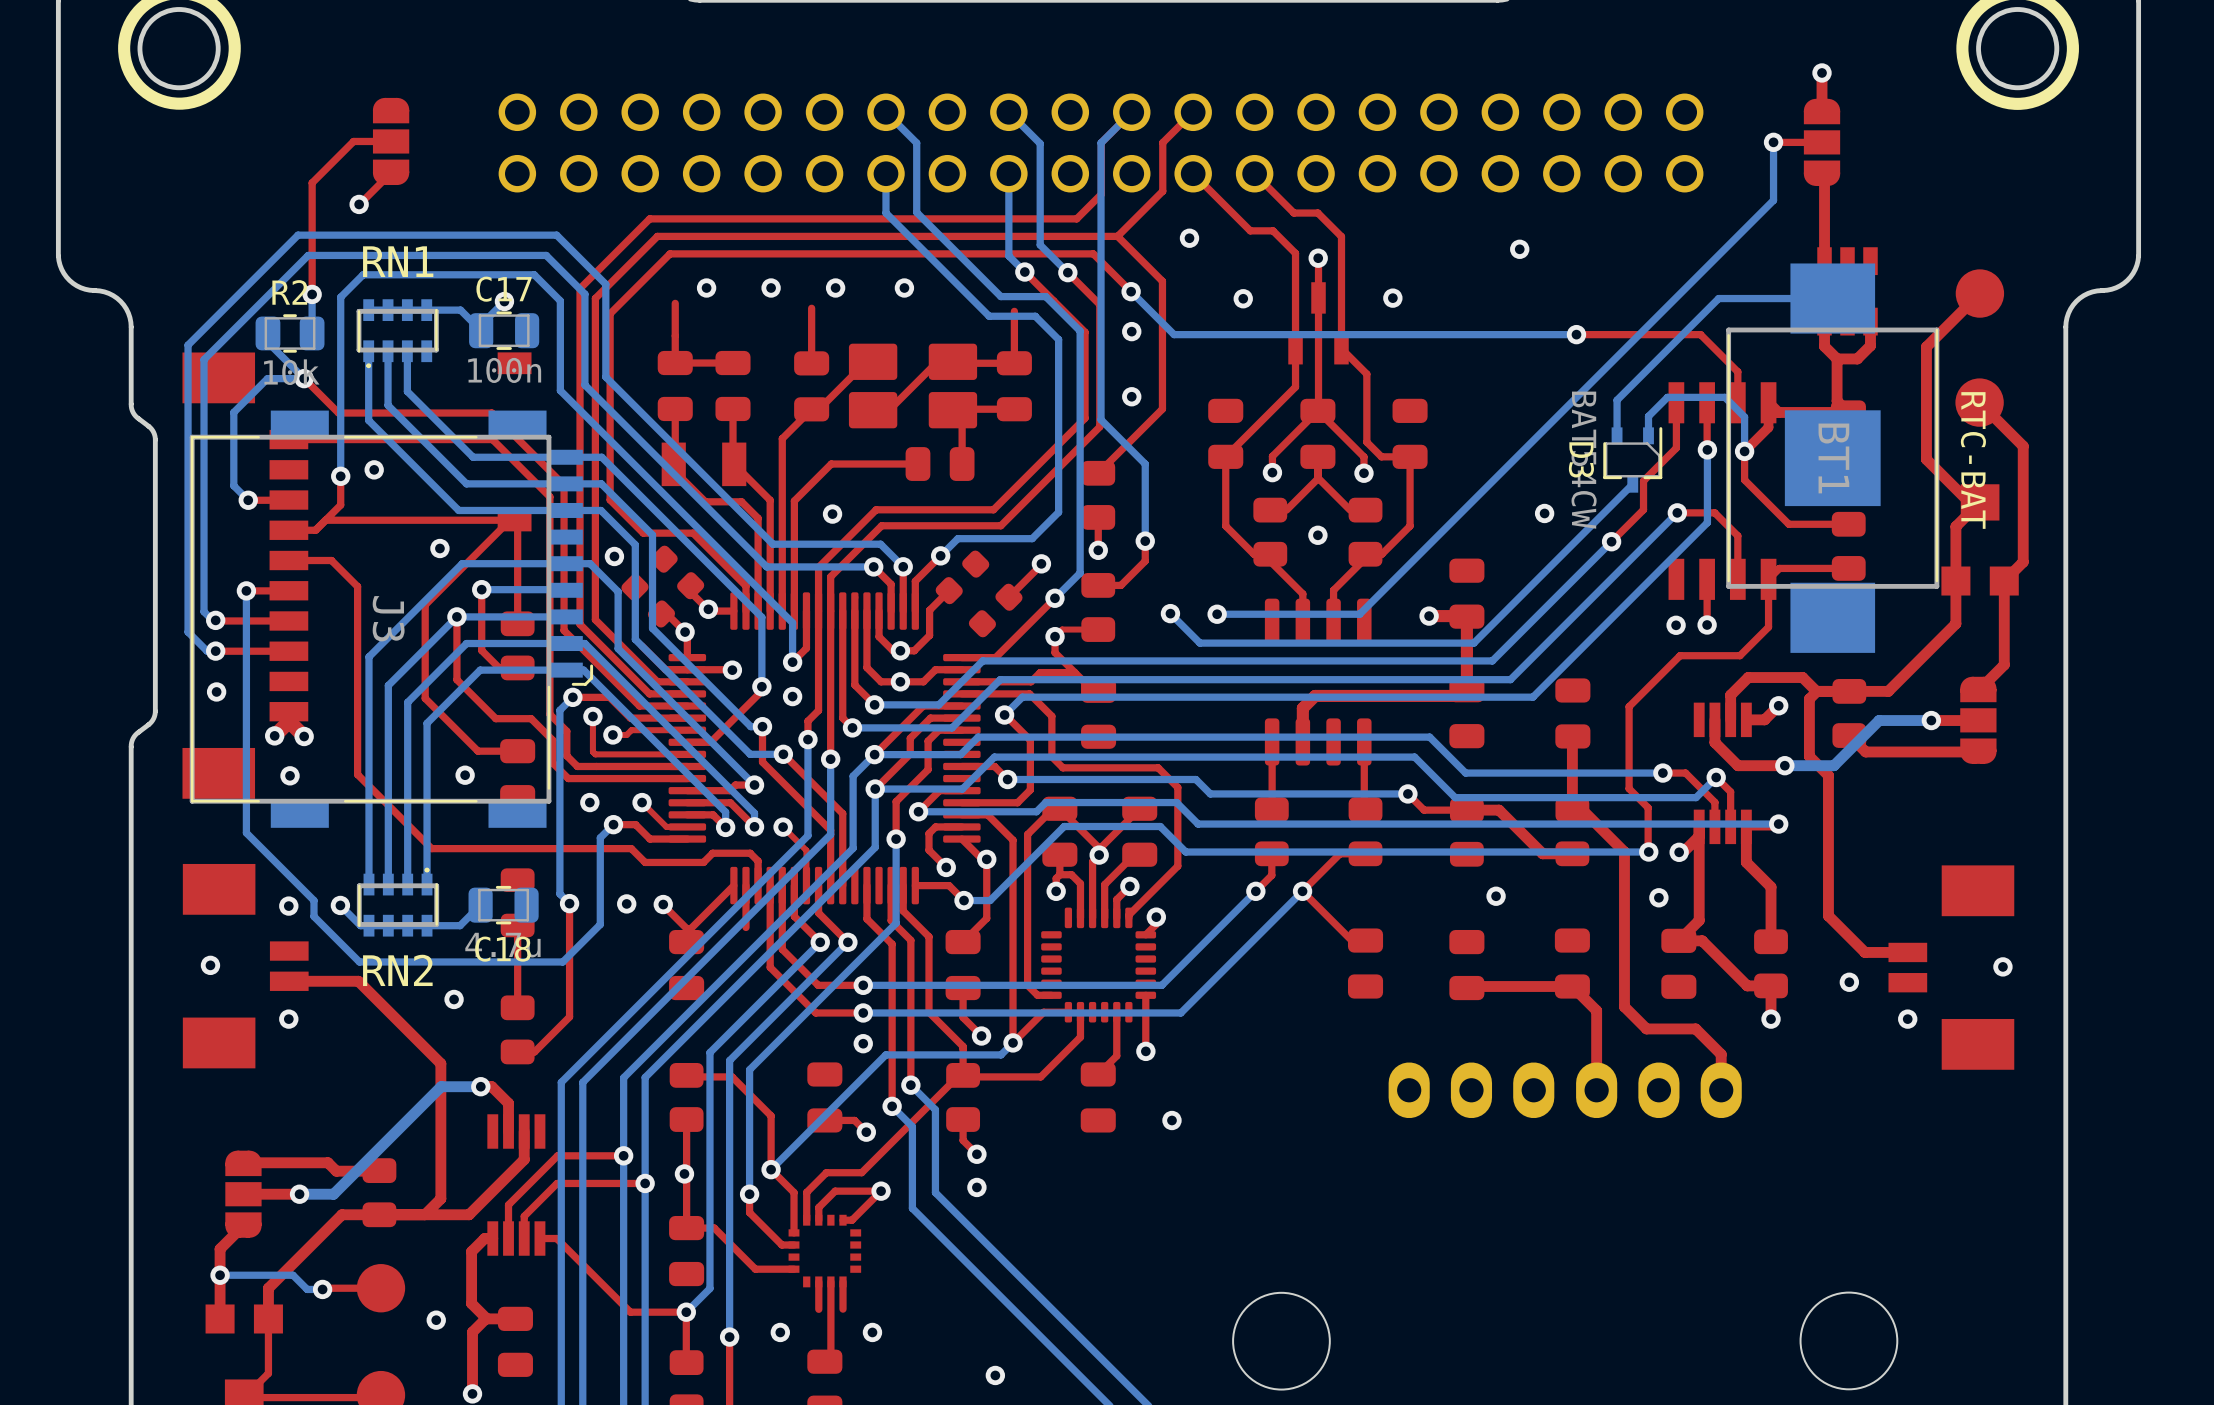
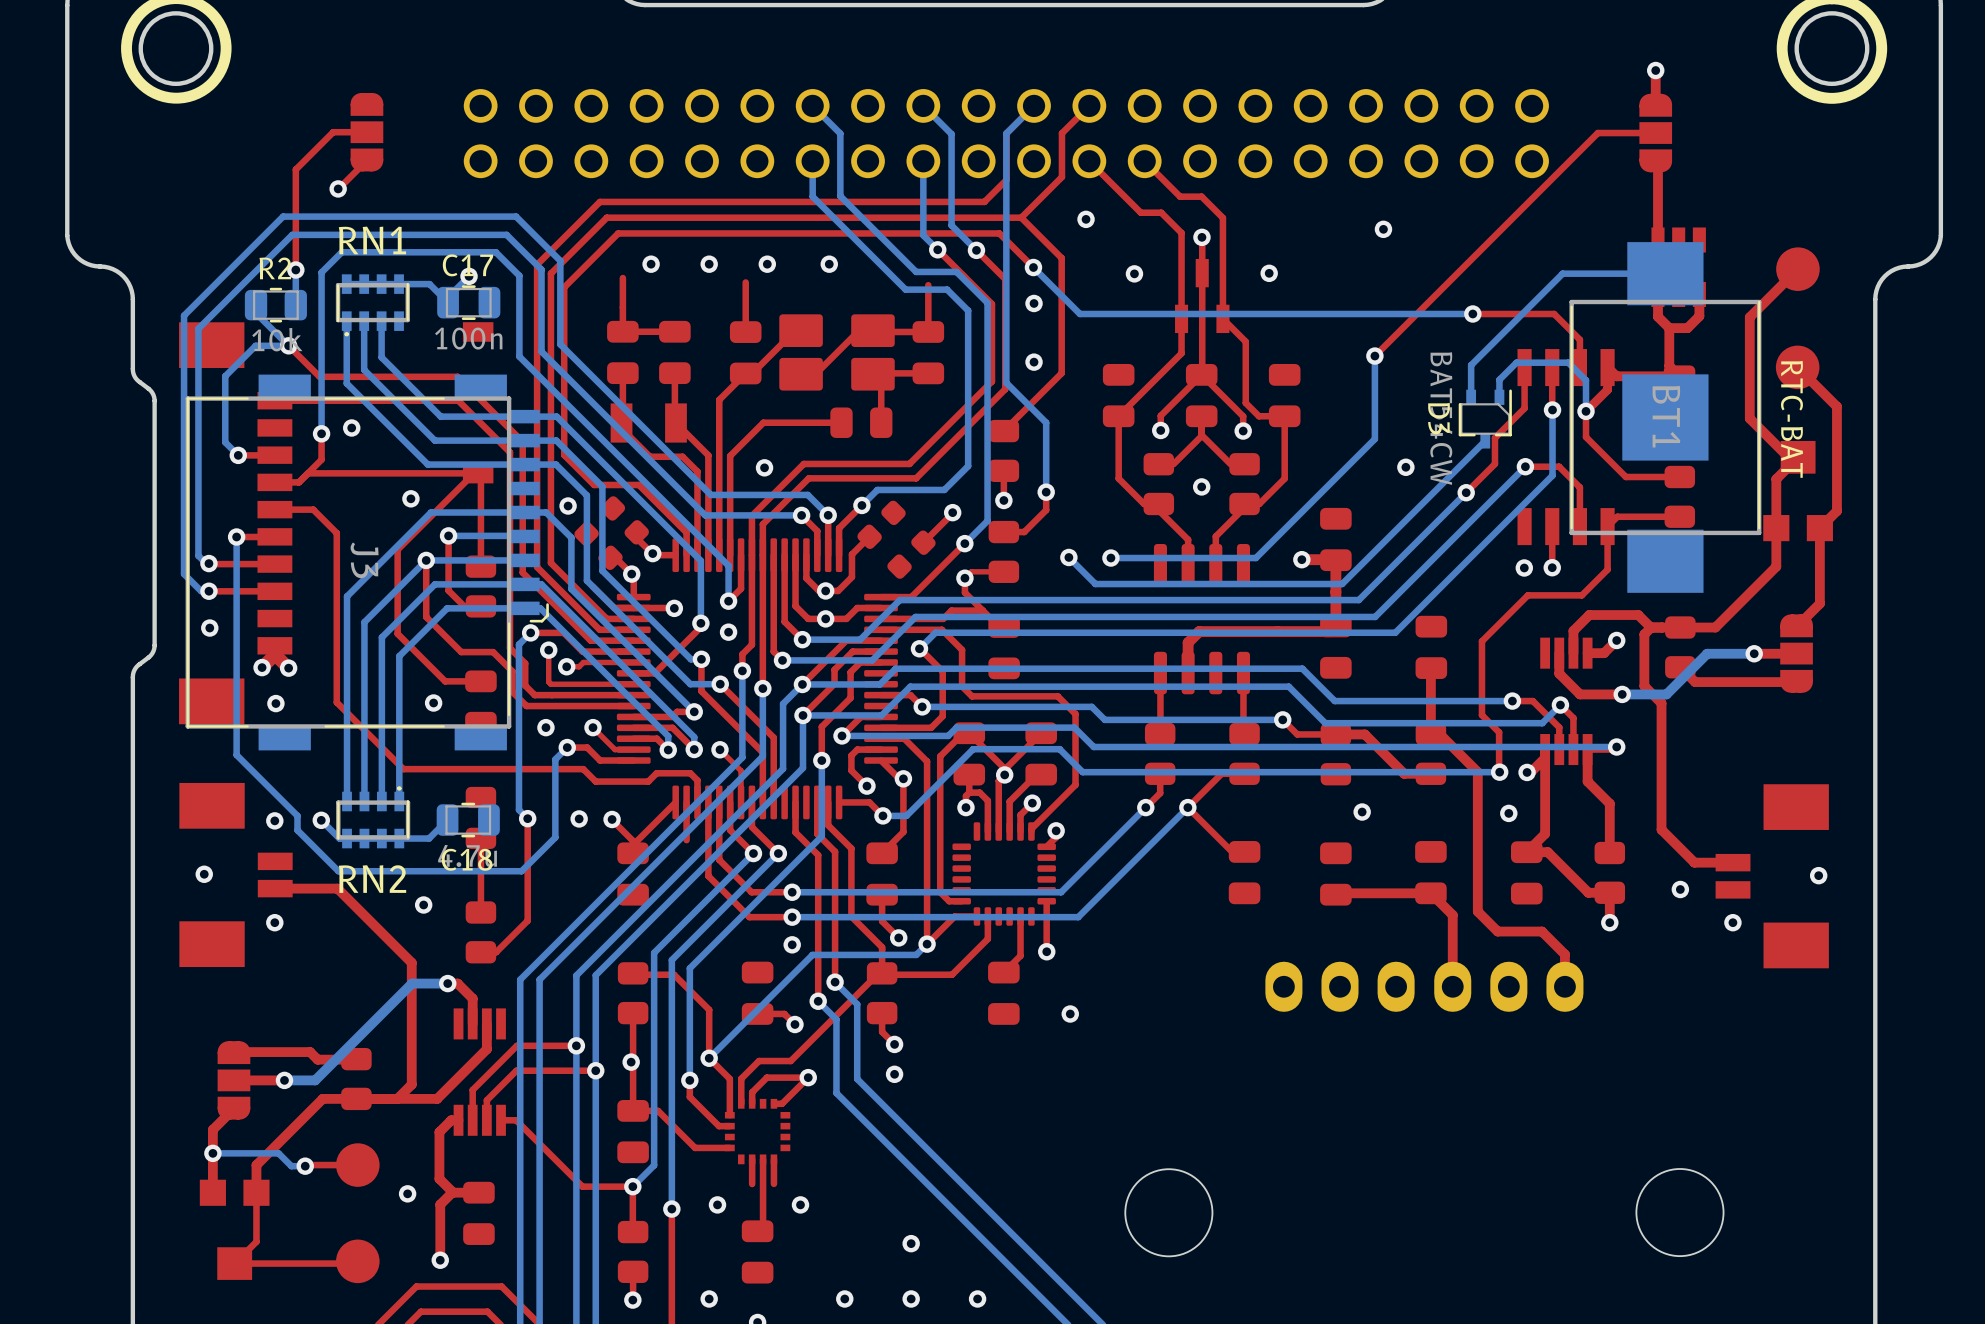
top track: none -> (1612, 133) (1597, 133) (1374, 356)
bottom track: (1773, 142) (1773, 200) (1359, 614) -> (1374, 356) (1374, 439) (1255, 558) (1239, 558)
via: (1773, 142) -> none
top track: (1576, 334) (1700, 334) (1709, 343) -> (1472, 313) (1554, 313)
bottom track: (1576, 334) (1174, 334) -> (1472, 313) (1079, 313) (1072, 306)
via: (1576, 334) -> none
via: none -> (1472, 313)
via: none -> (1374, 356)

